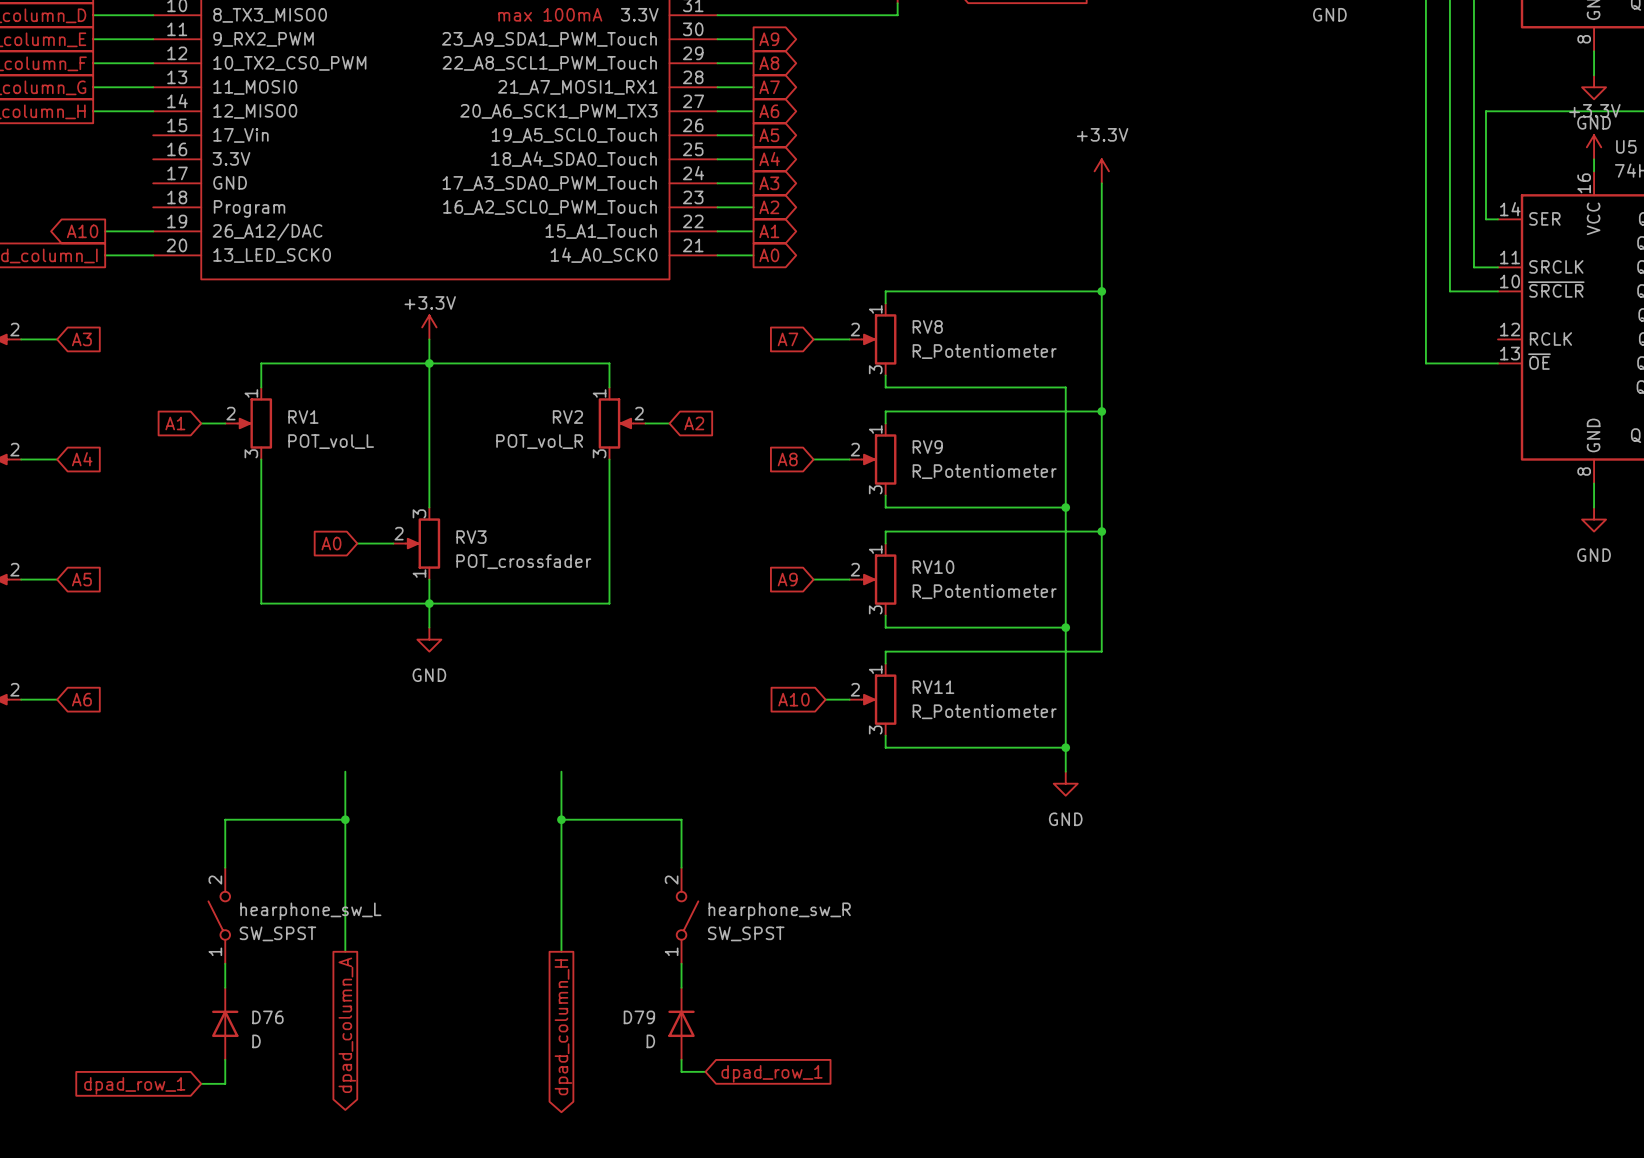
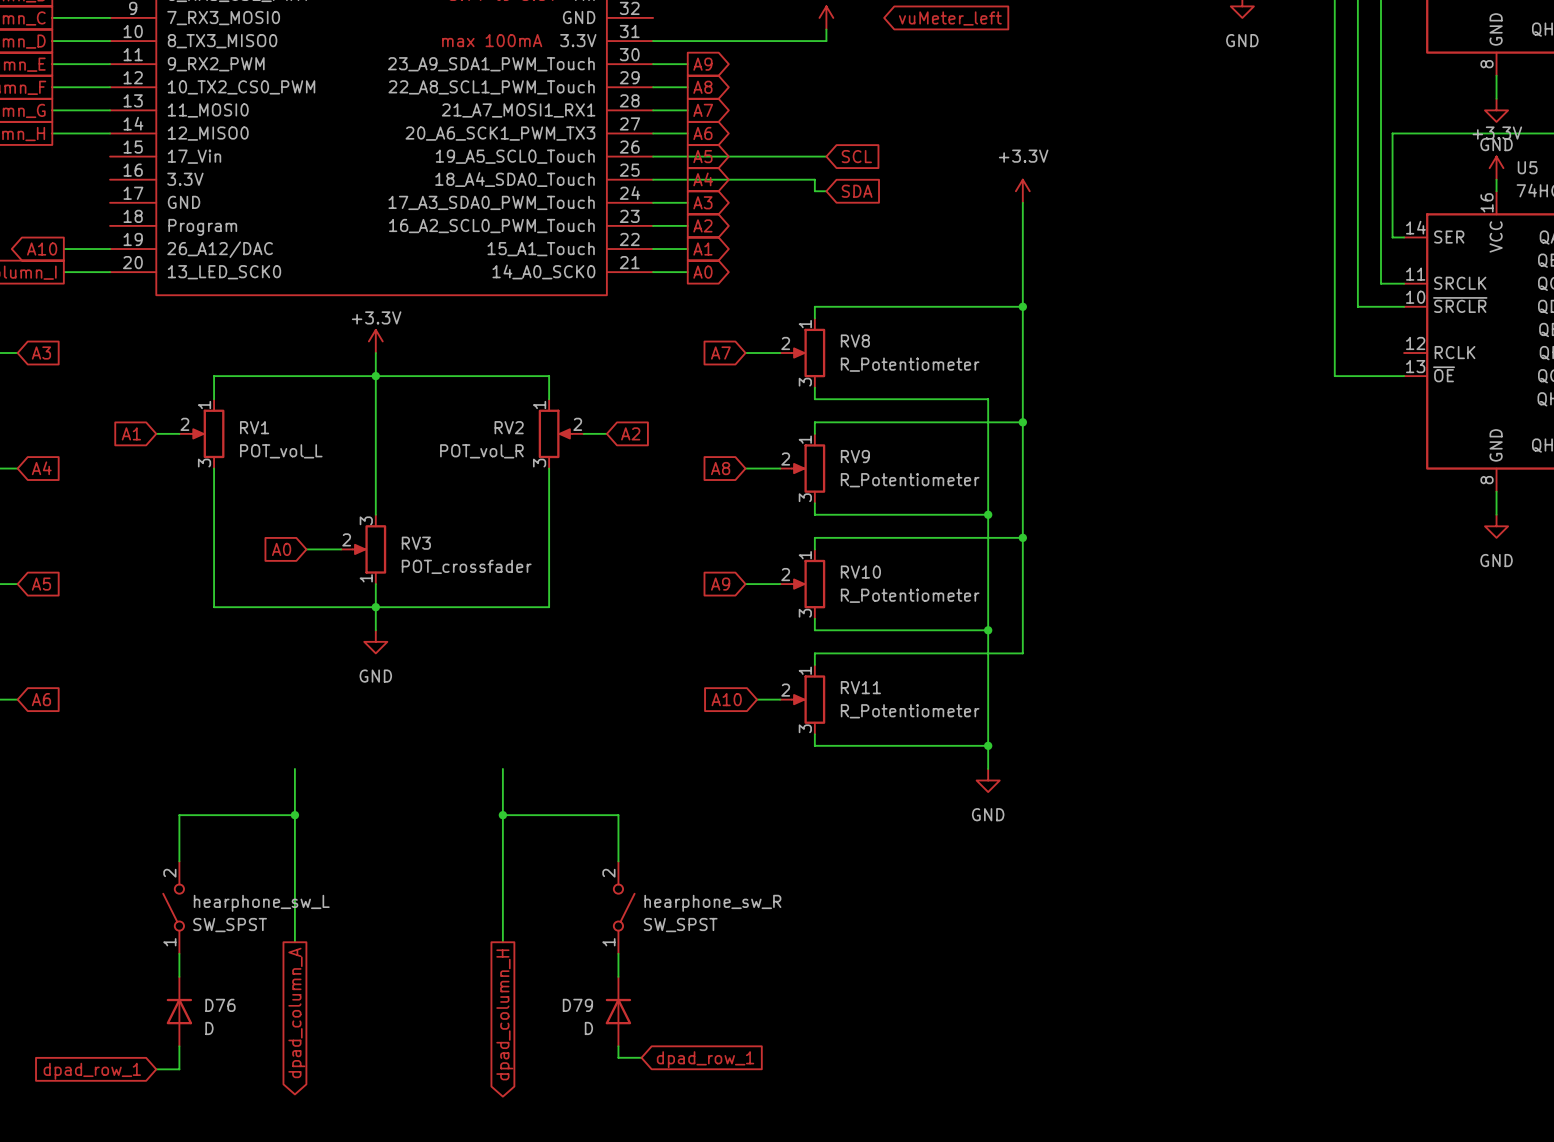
wire: none -> (687, 156) (826, 156)
global label: none -> SCL (856, 156)
wire: none -> (687, 179) (814, 179) (814, 191) (826, 191)
global label: none -> SDA (857, 191)

